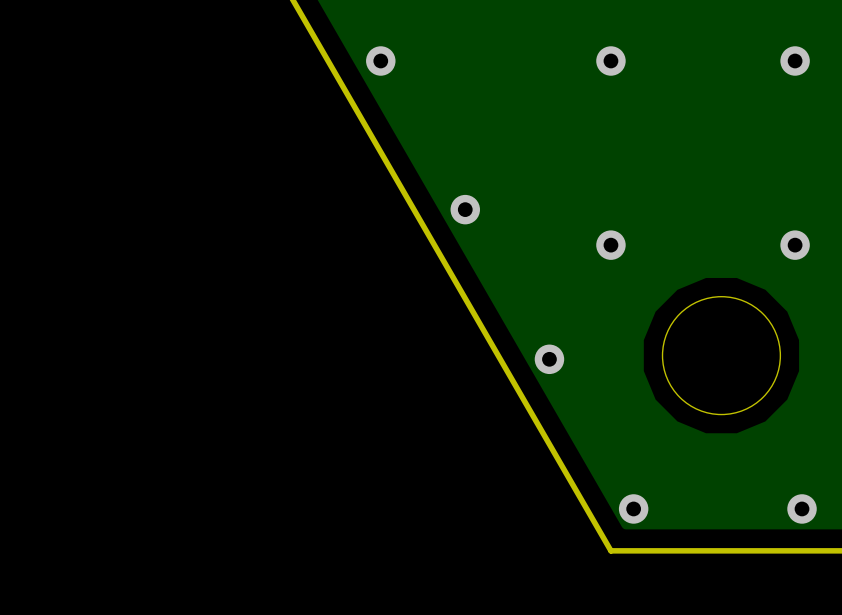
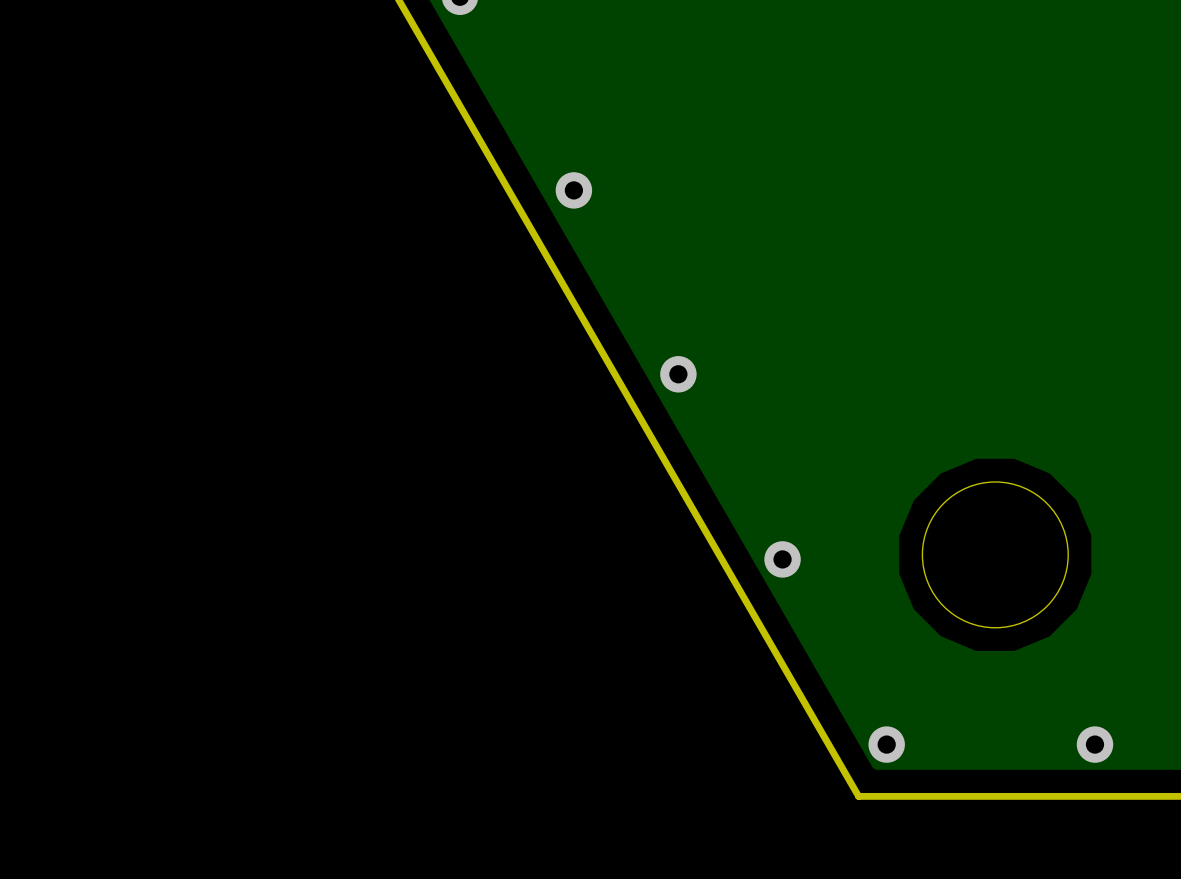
via: (610, 60) -> none
via: (795, 60) -> none
via: (610, 245) -> none
via: (795, 245) -> none

